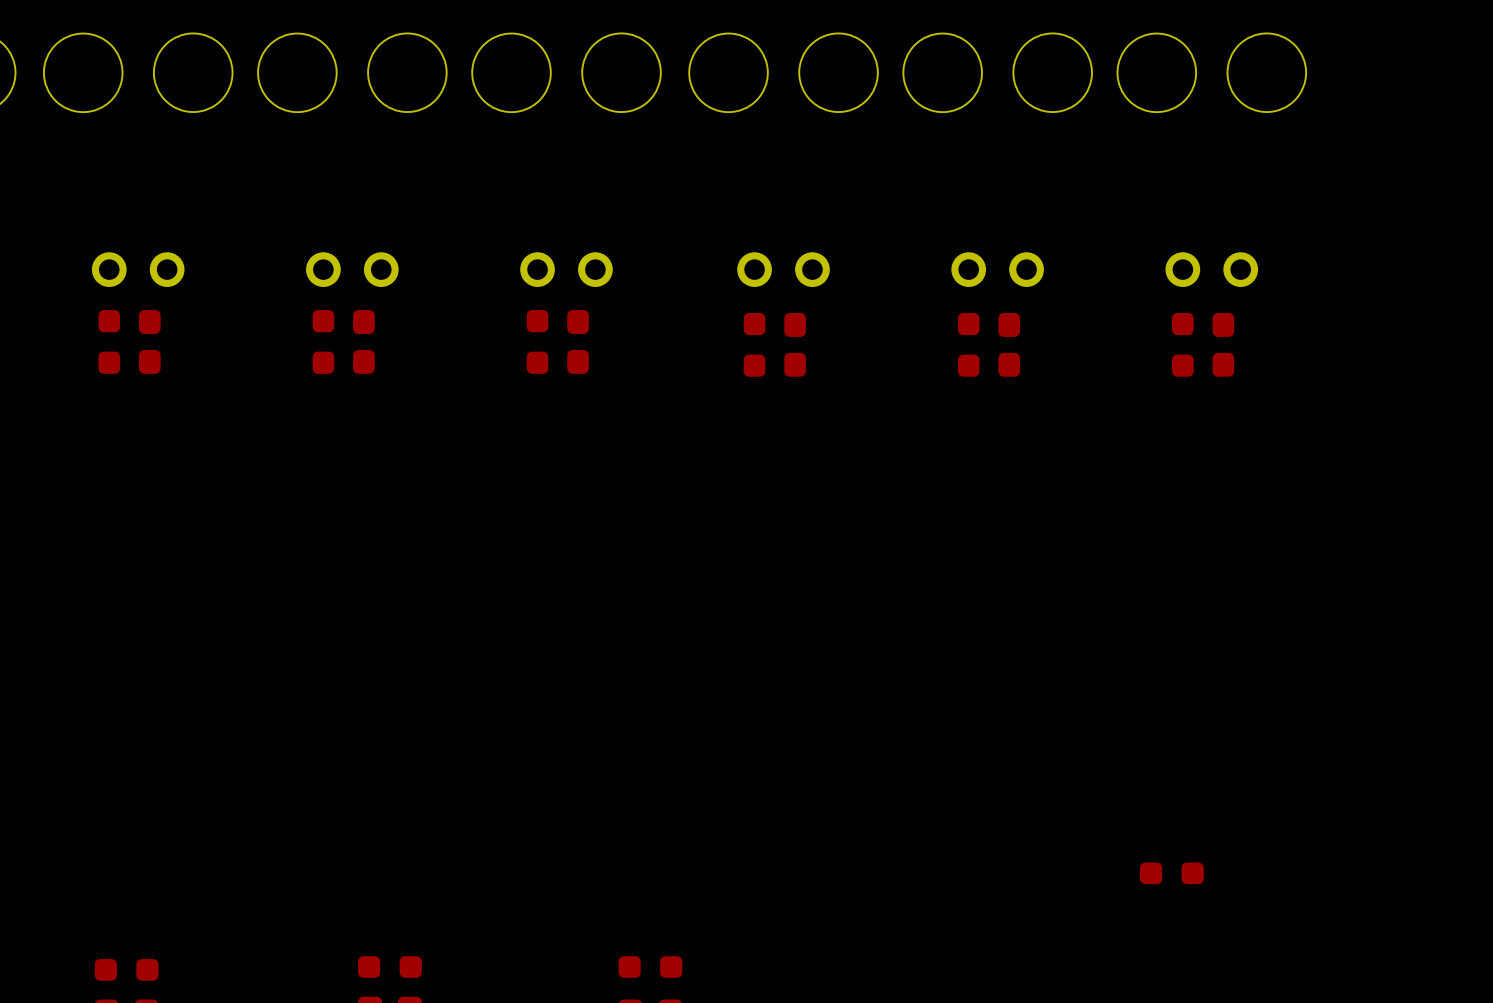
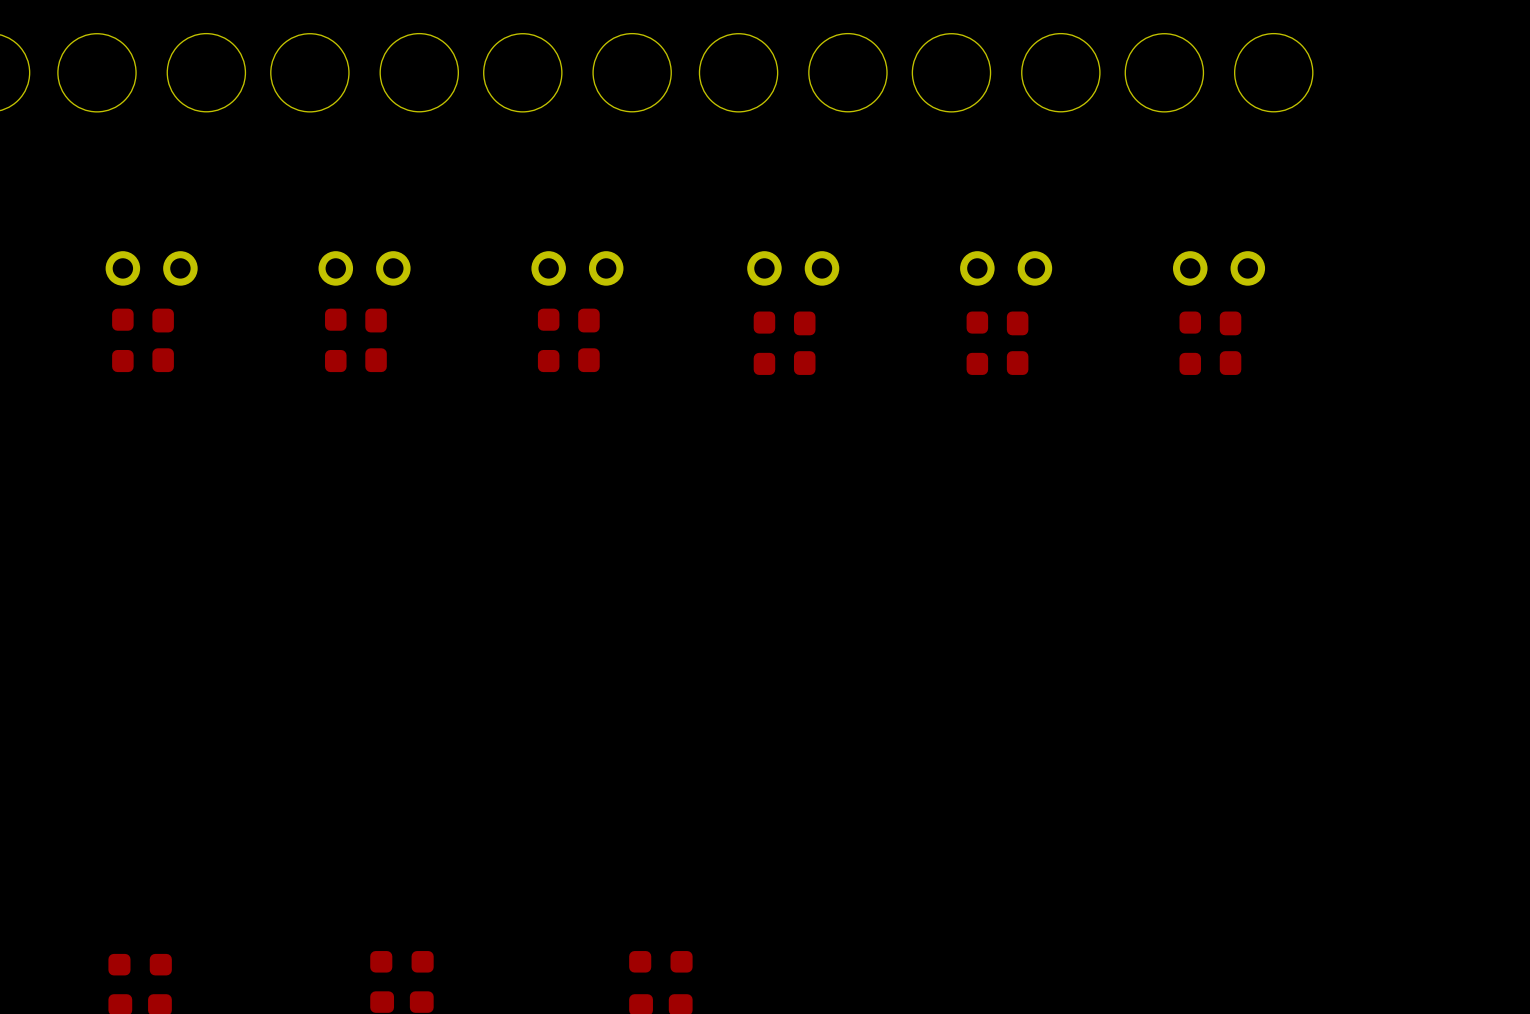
part: (1171, 873) -> none

